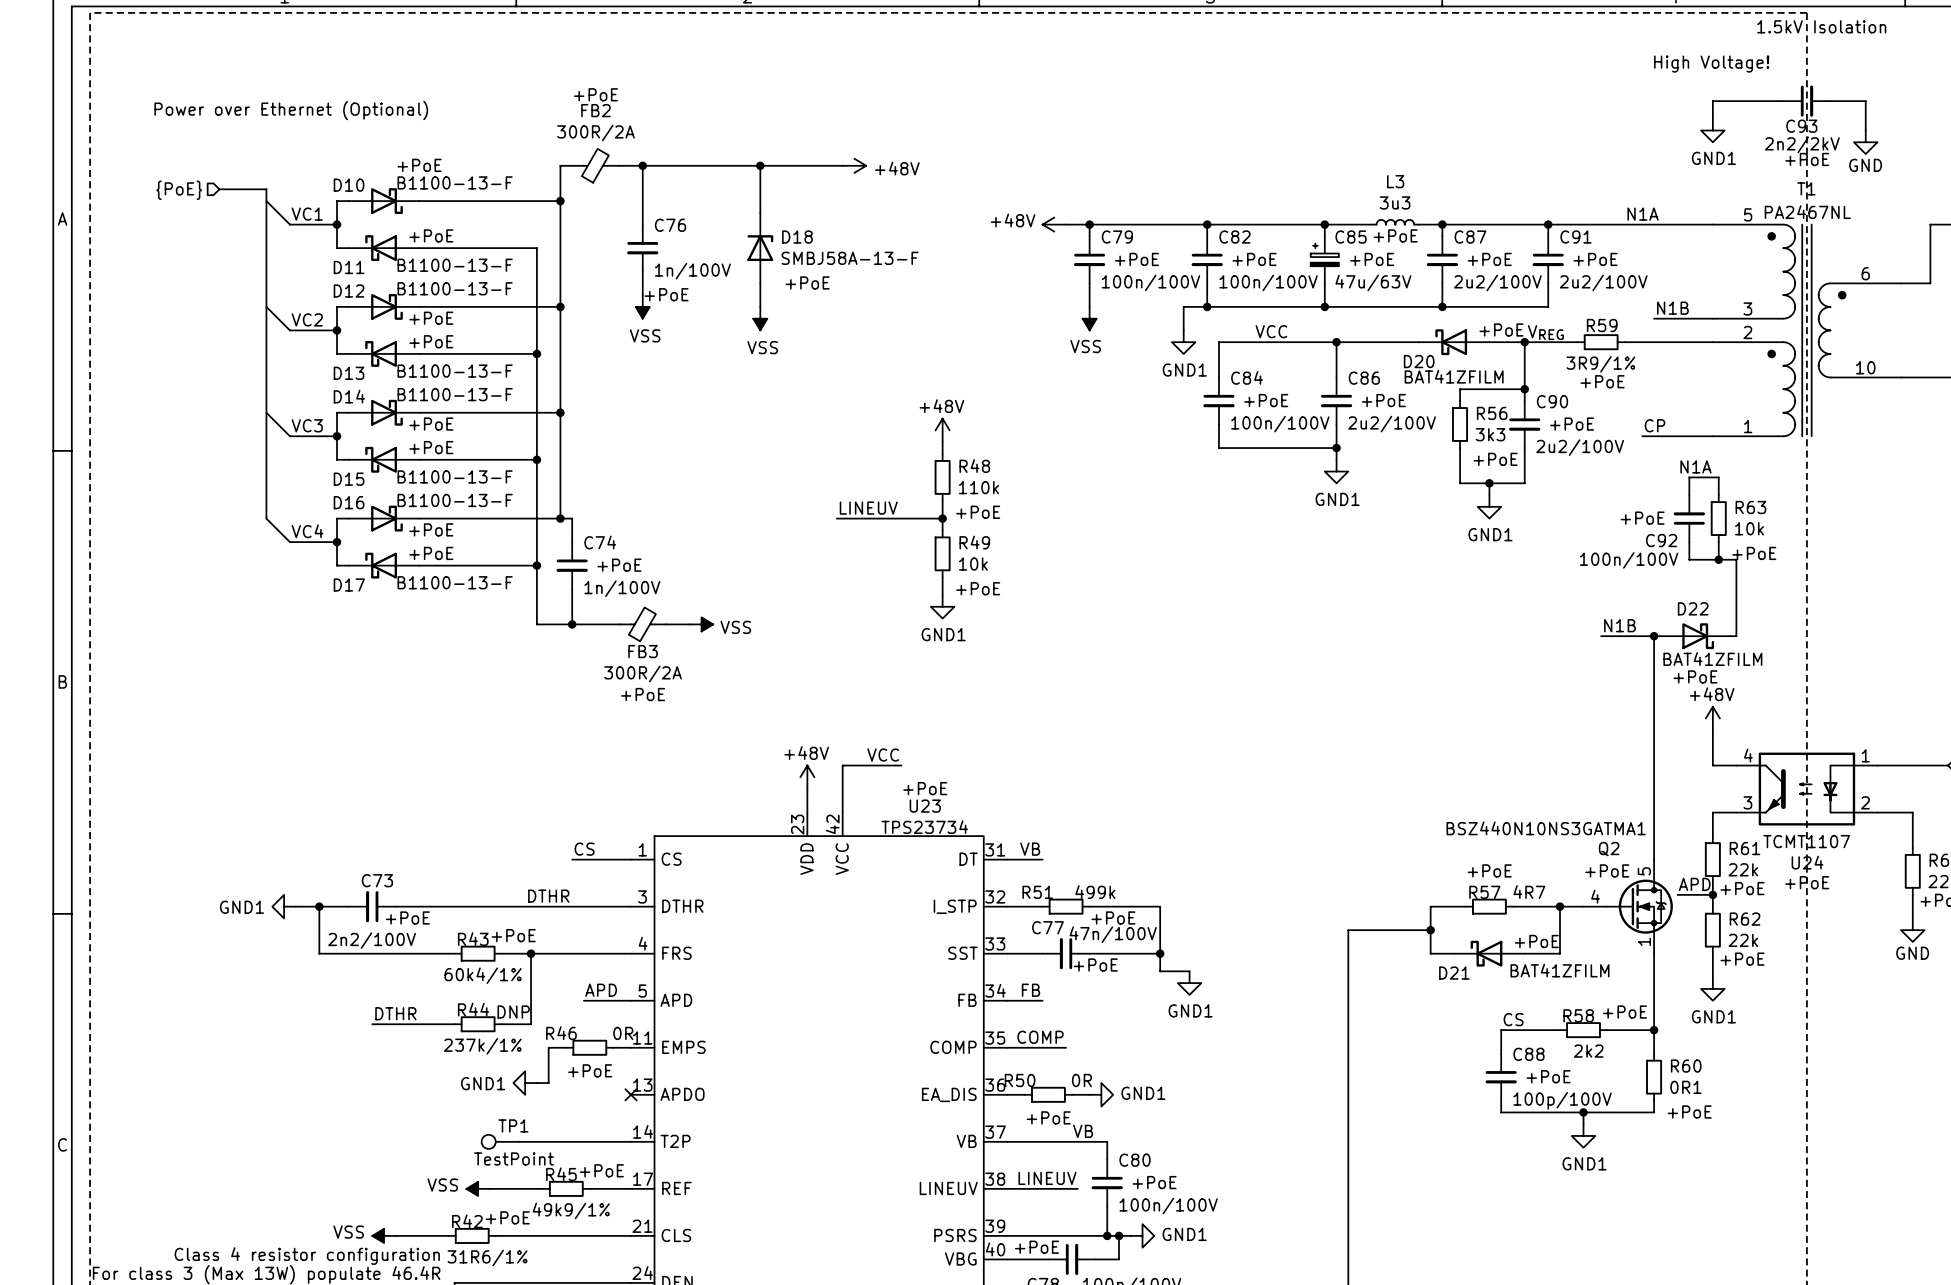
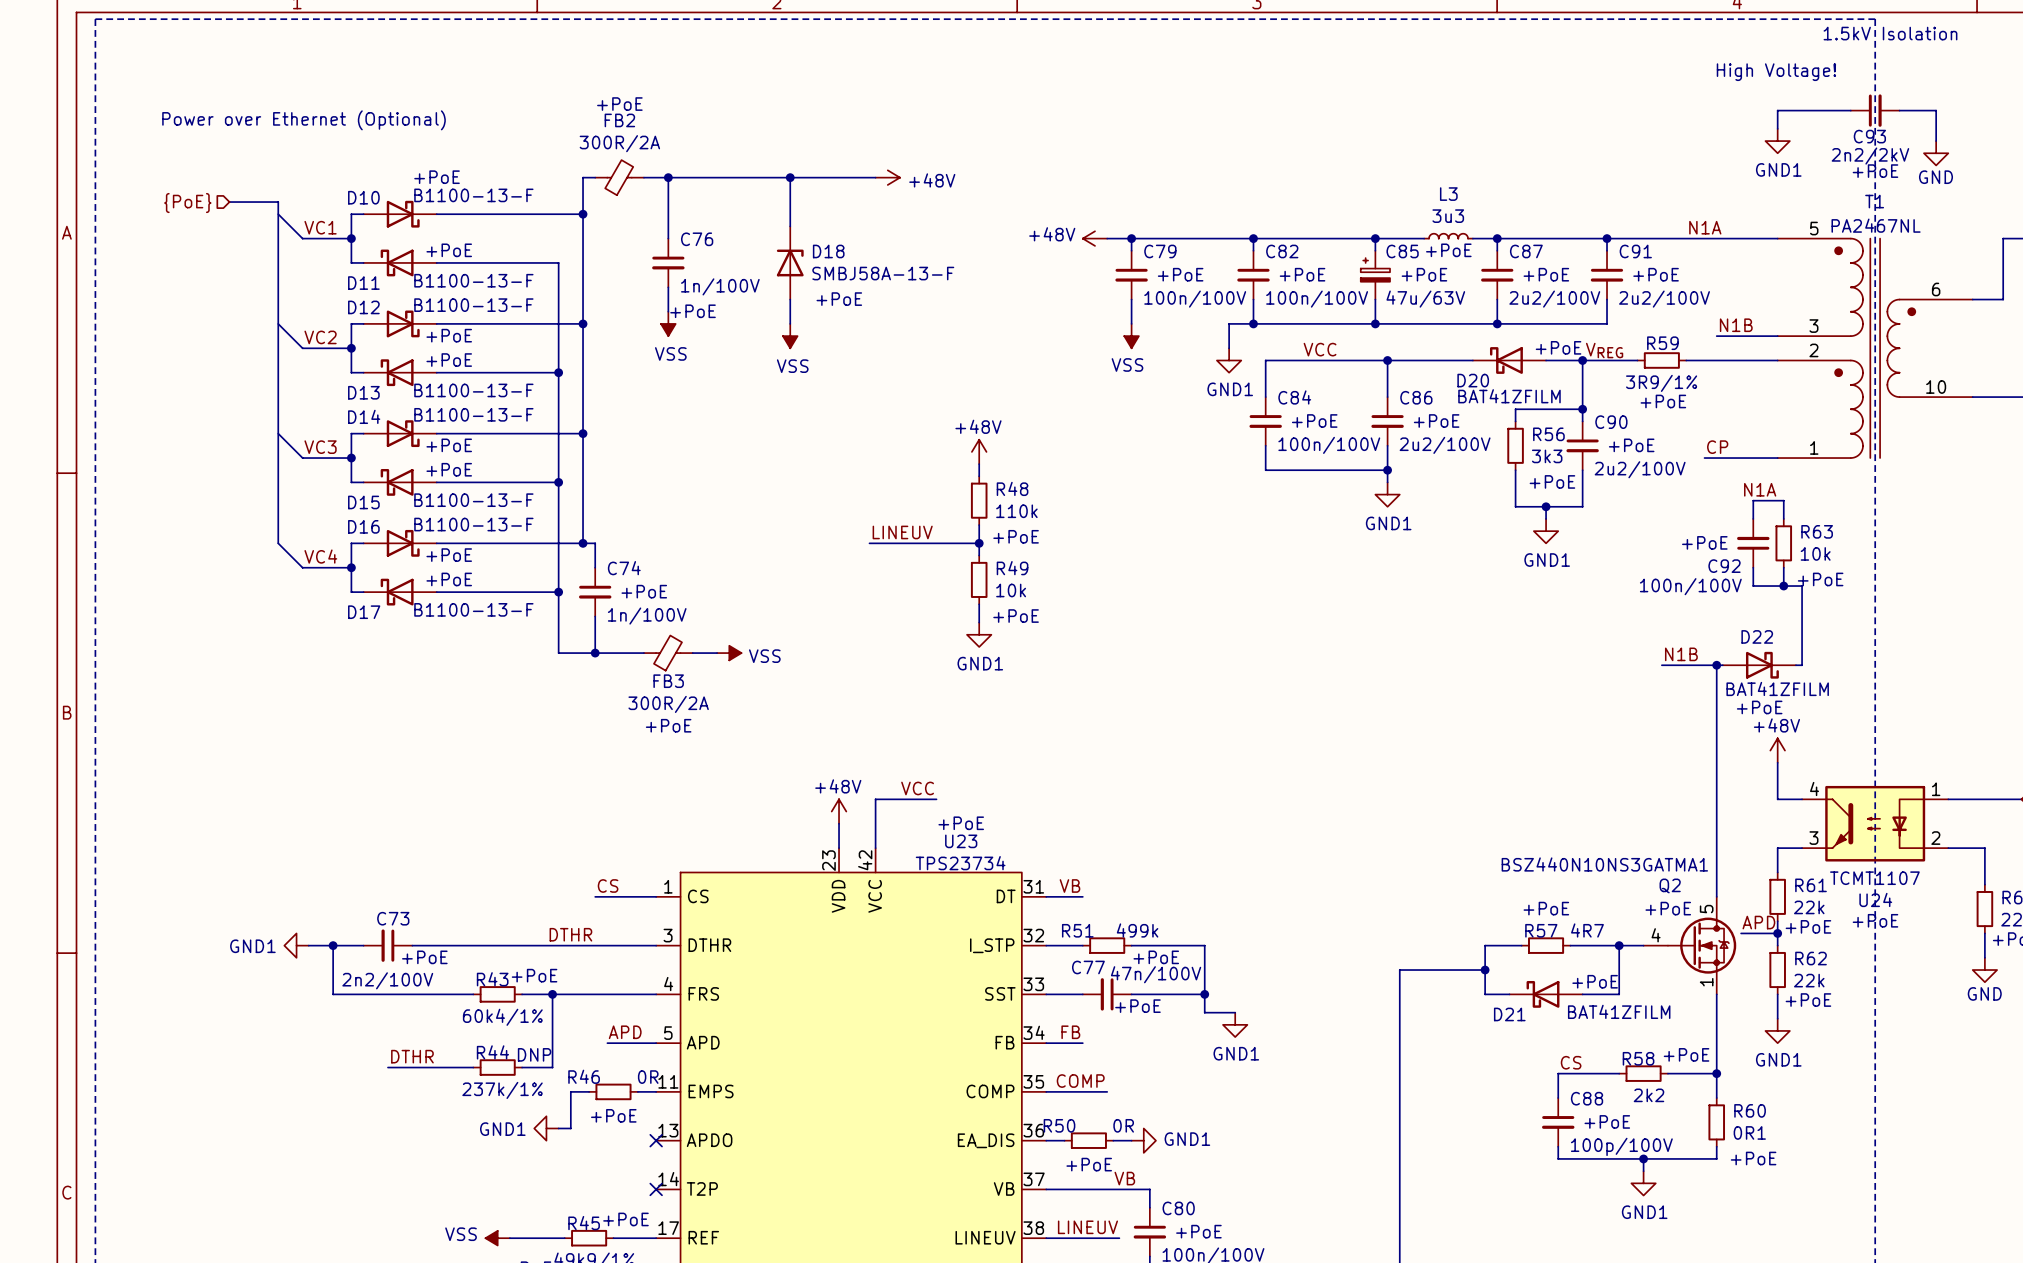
TP1: TestPoint (500, 1141) -> none
wire: (519, 1141) (630, 1141) -> none
no-connect mark: none -> (656, 1189)

